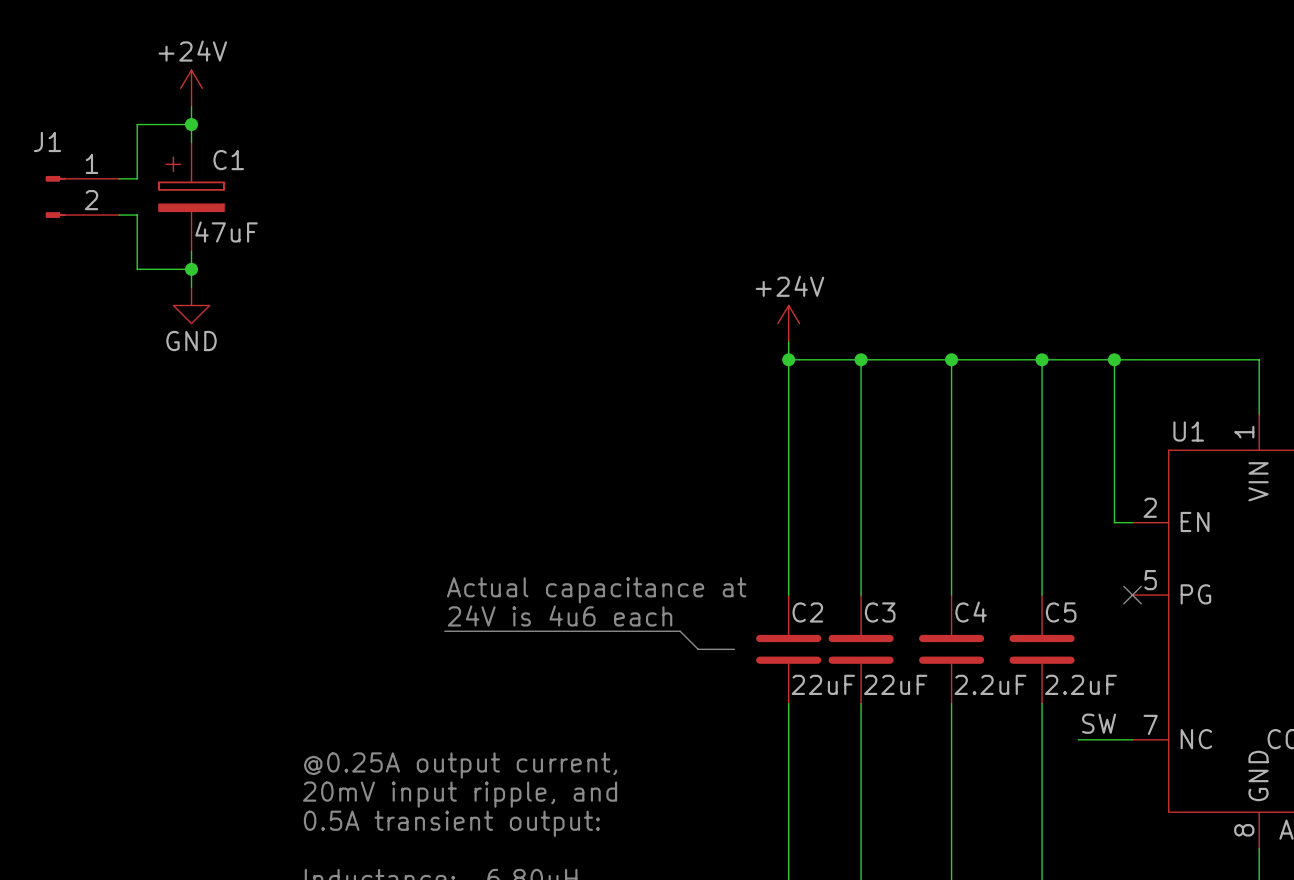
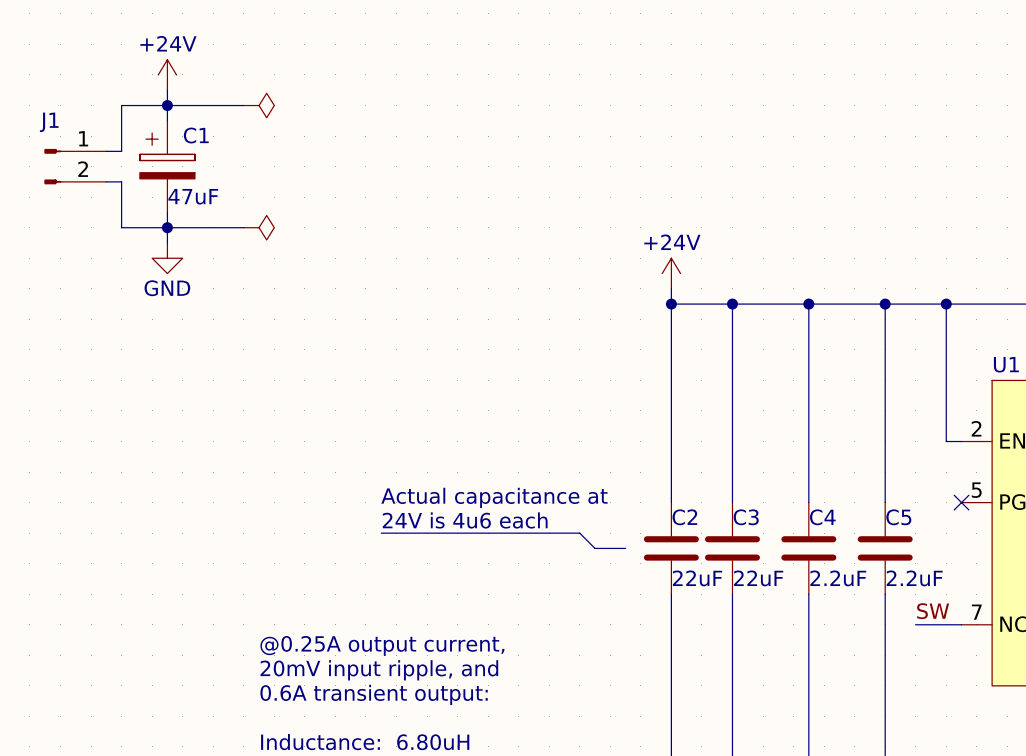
wire: none -> (167, 105) (243, 105)
power symbol: none -> (259, 105)
wire: none -> (167, 227) (243, 227)
power symbol: none -> (259, 227)
text: 0.5A transient output: (451, 823) -> 0.6A transient output: (374, 694)

